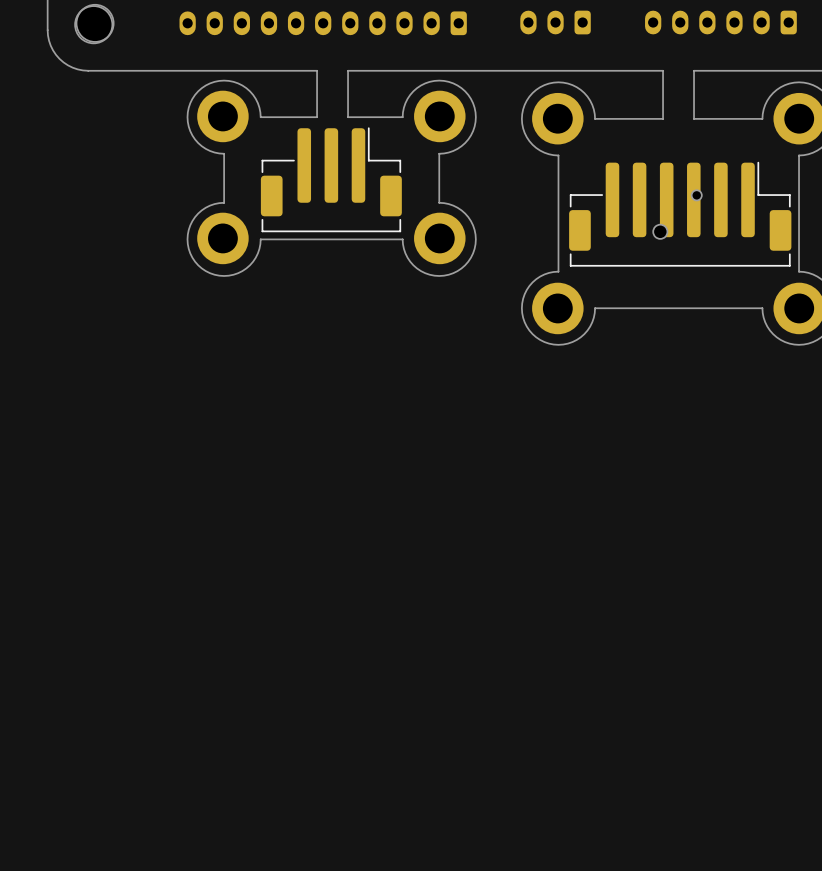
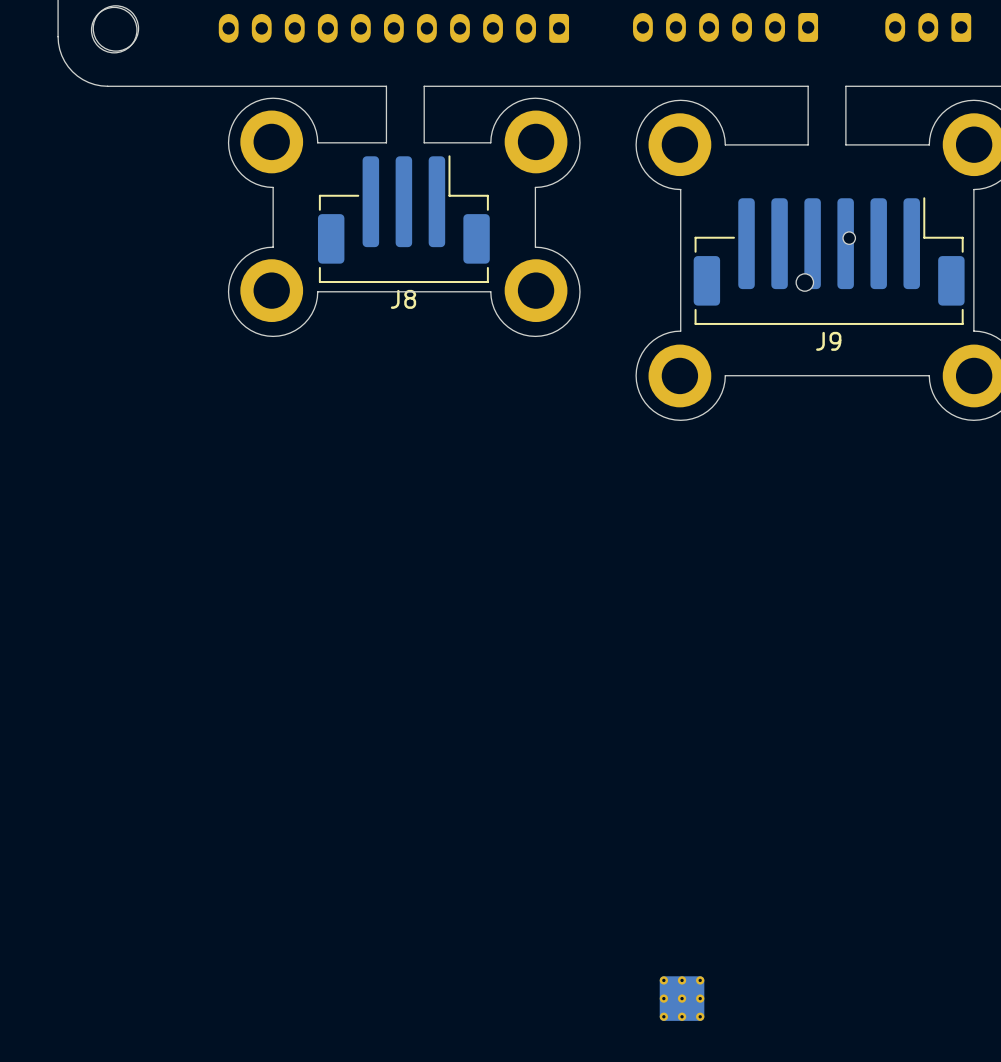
part position: (555, 22) -> (928, 27)
part position: (720, 22) -> (725, 27)
J8 name: none -> J8 (403, 299)
J9 name: none -> J9 (828, 341)
part: none -> (682, 998)

